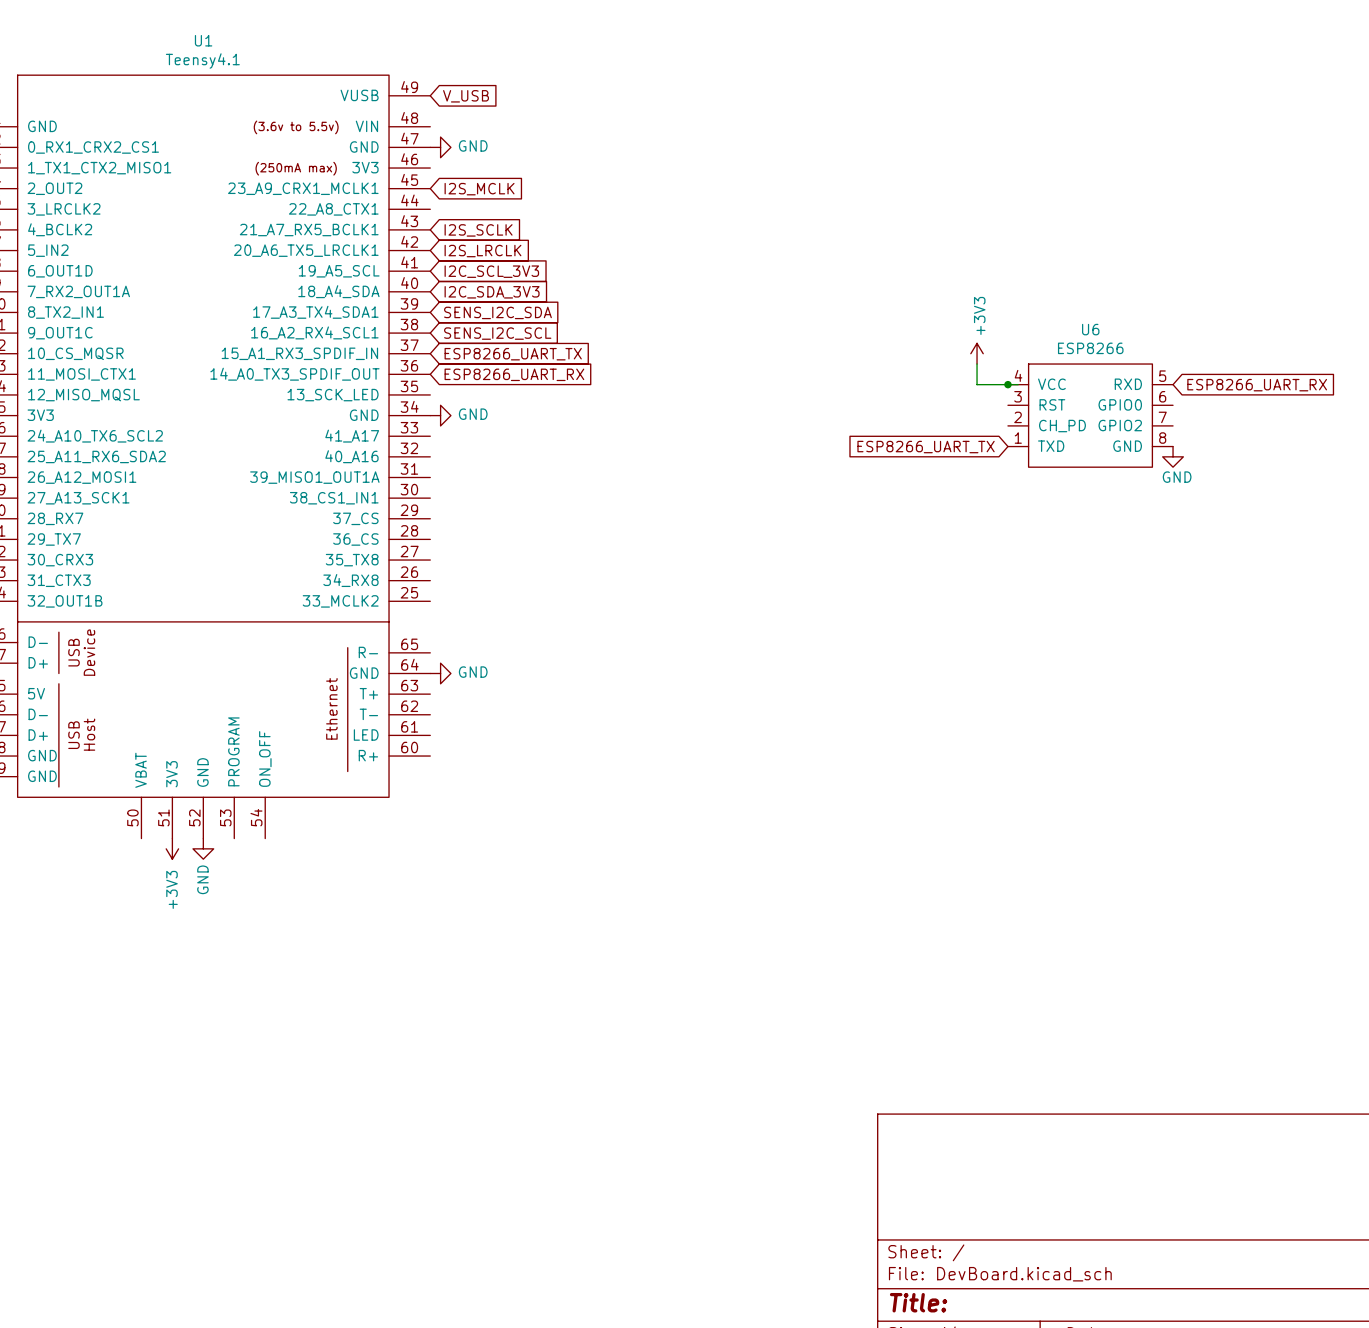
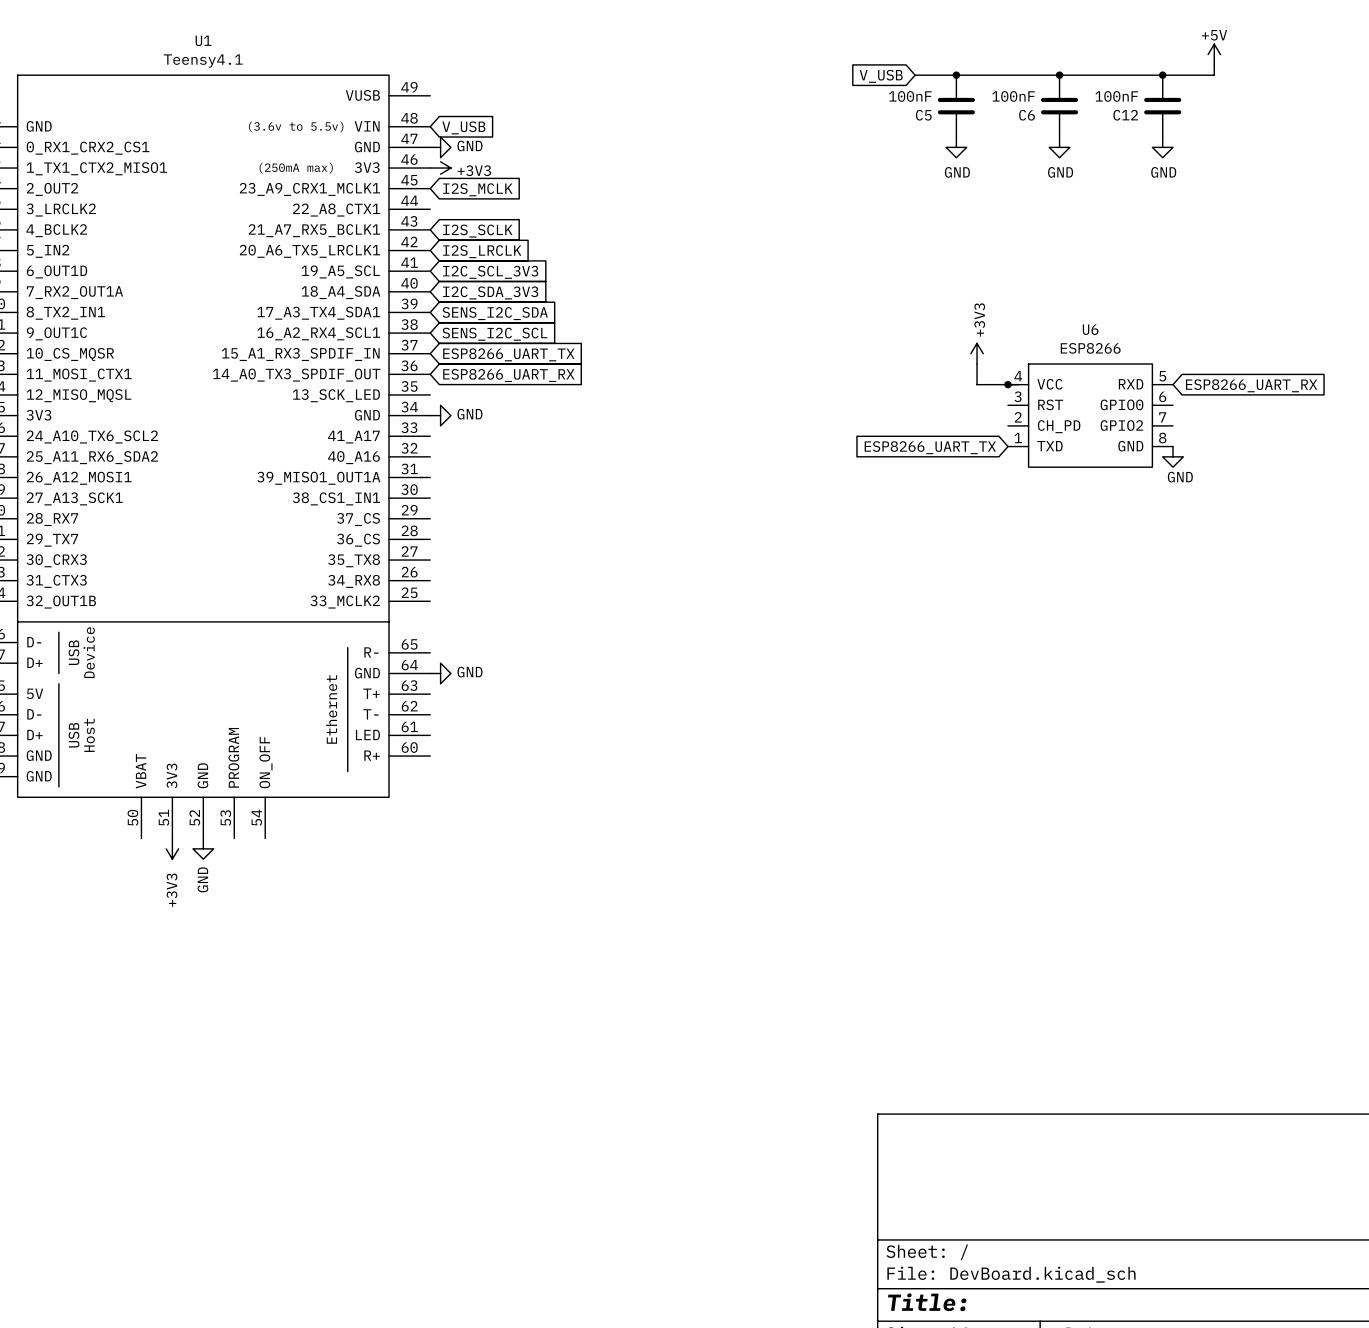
power symbol: none -> +5V (1214, 54)
wire: none -> (1214, 64) (1214, 75) (915, 75)
global label: none -> V_USB (881, 76)
junction: none -> (956, 75)
junction: none -> (1059, 75)
junction: none -> (1162, 75)
global label position: V_USB (466, 96) -> V_USB (463, 127)
C5: none -> 100nF (956, 106)
C6: none -> 100nF (1059, 106)
C12: none -> 100nF (1162, 106)
power symbol: none -> GND (956, 147)
power symbol: none -> GND (1059, 147)
power symbol: none -> GND (1162, 147)
power symbol: none -> +3V3 (440, 168)

